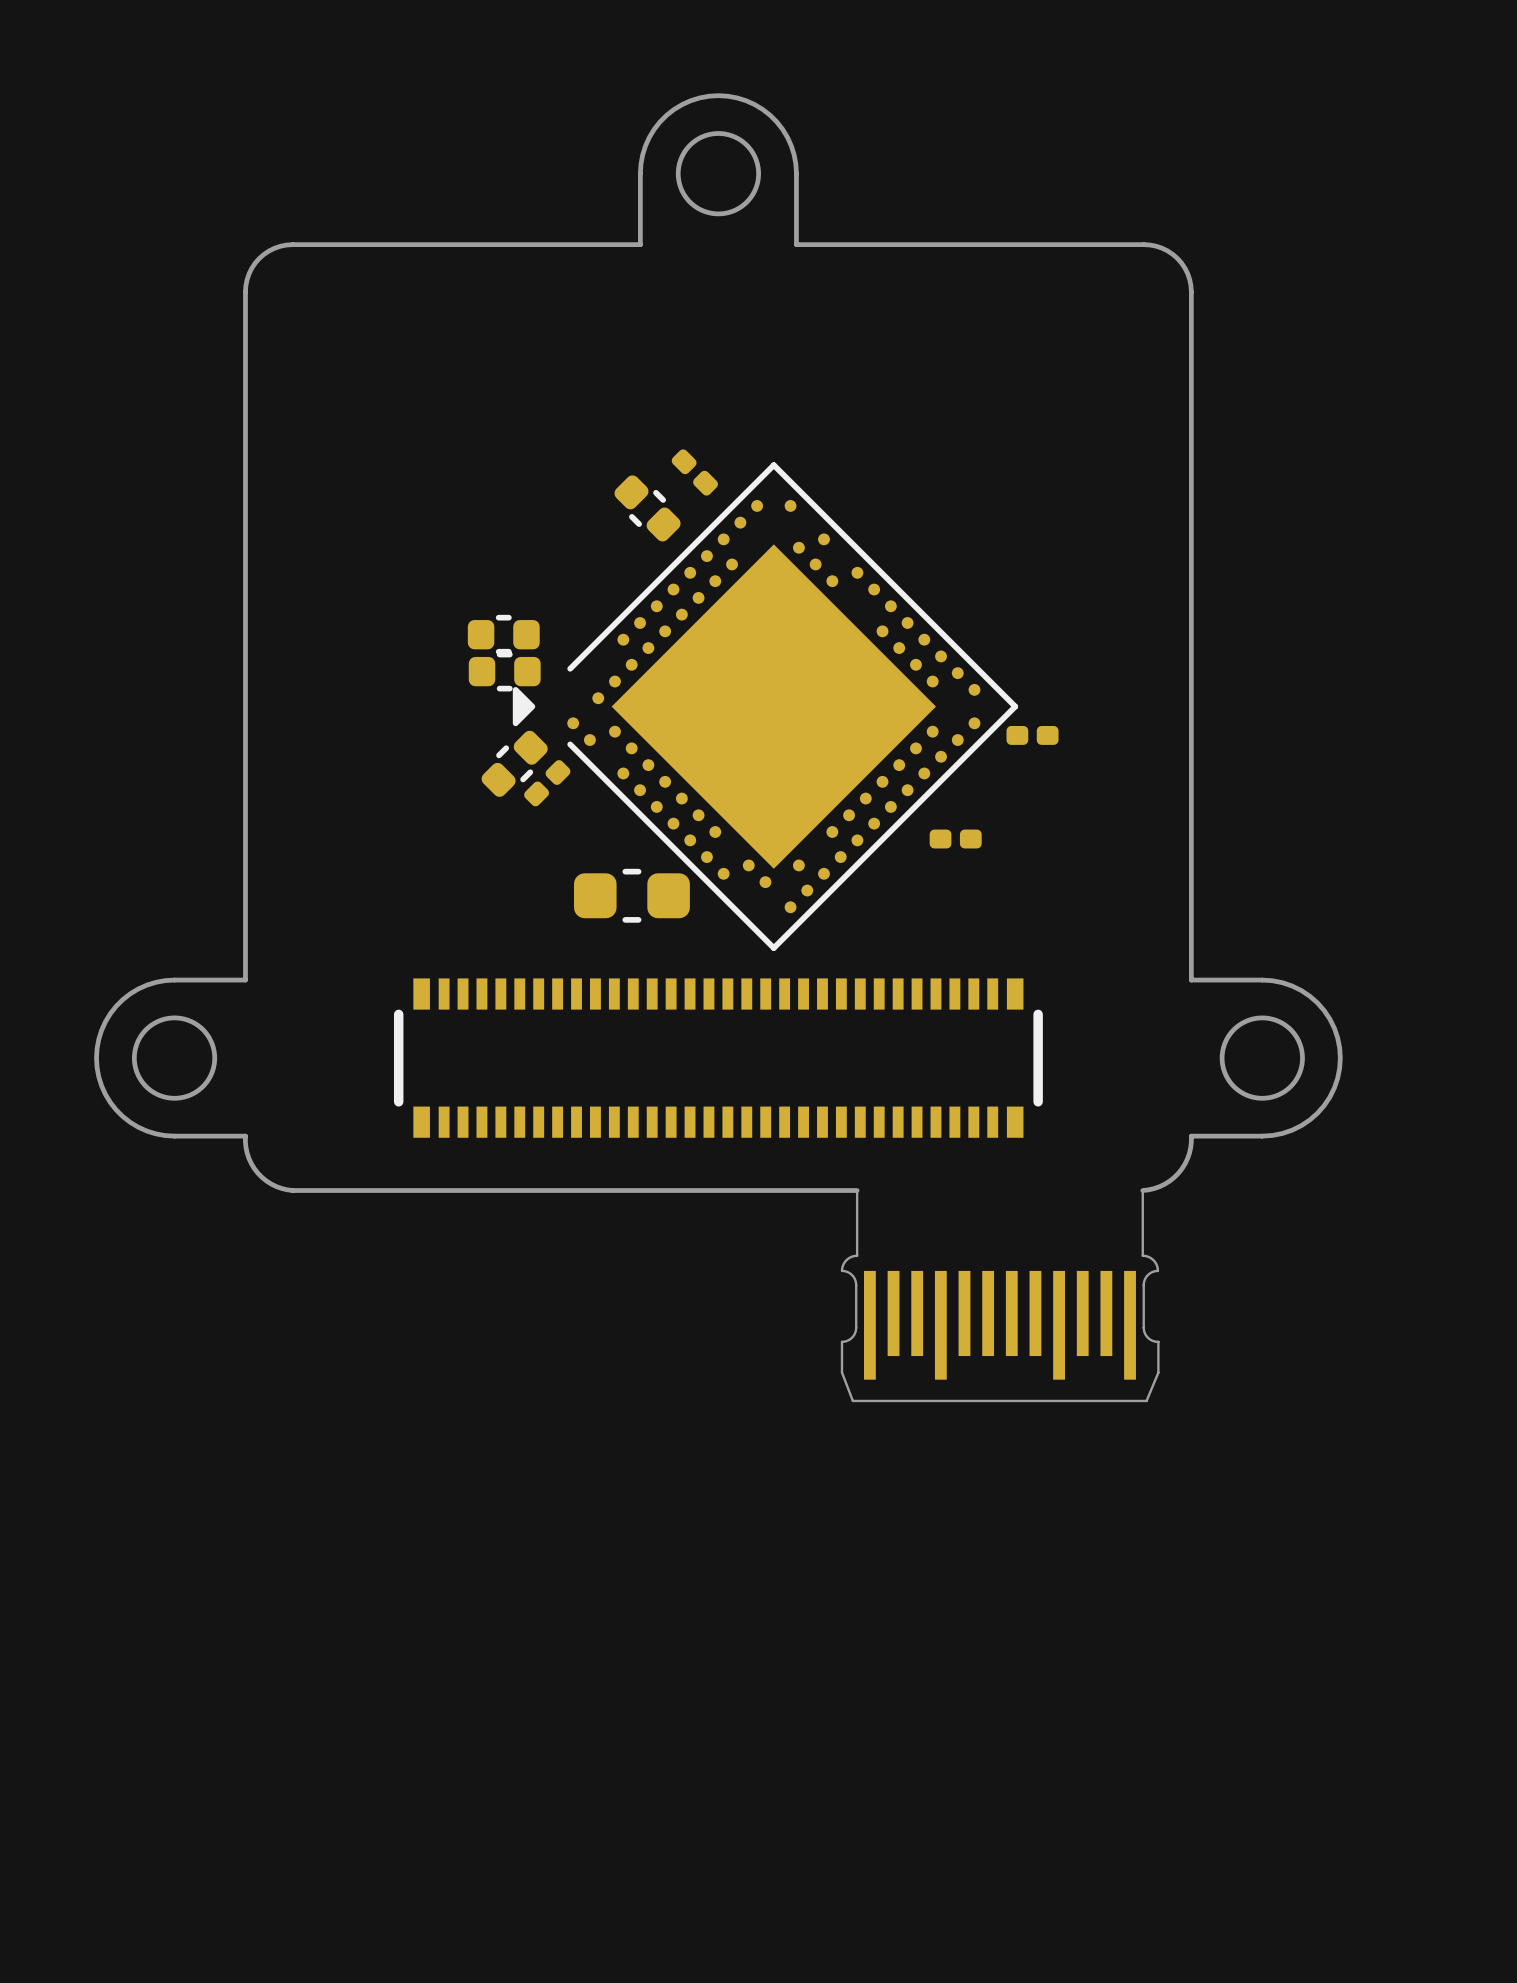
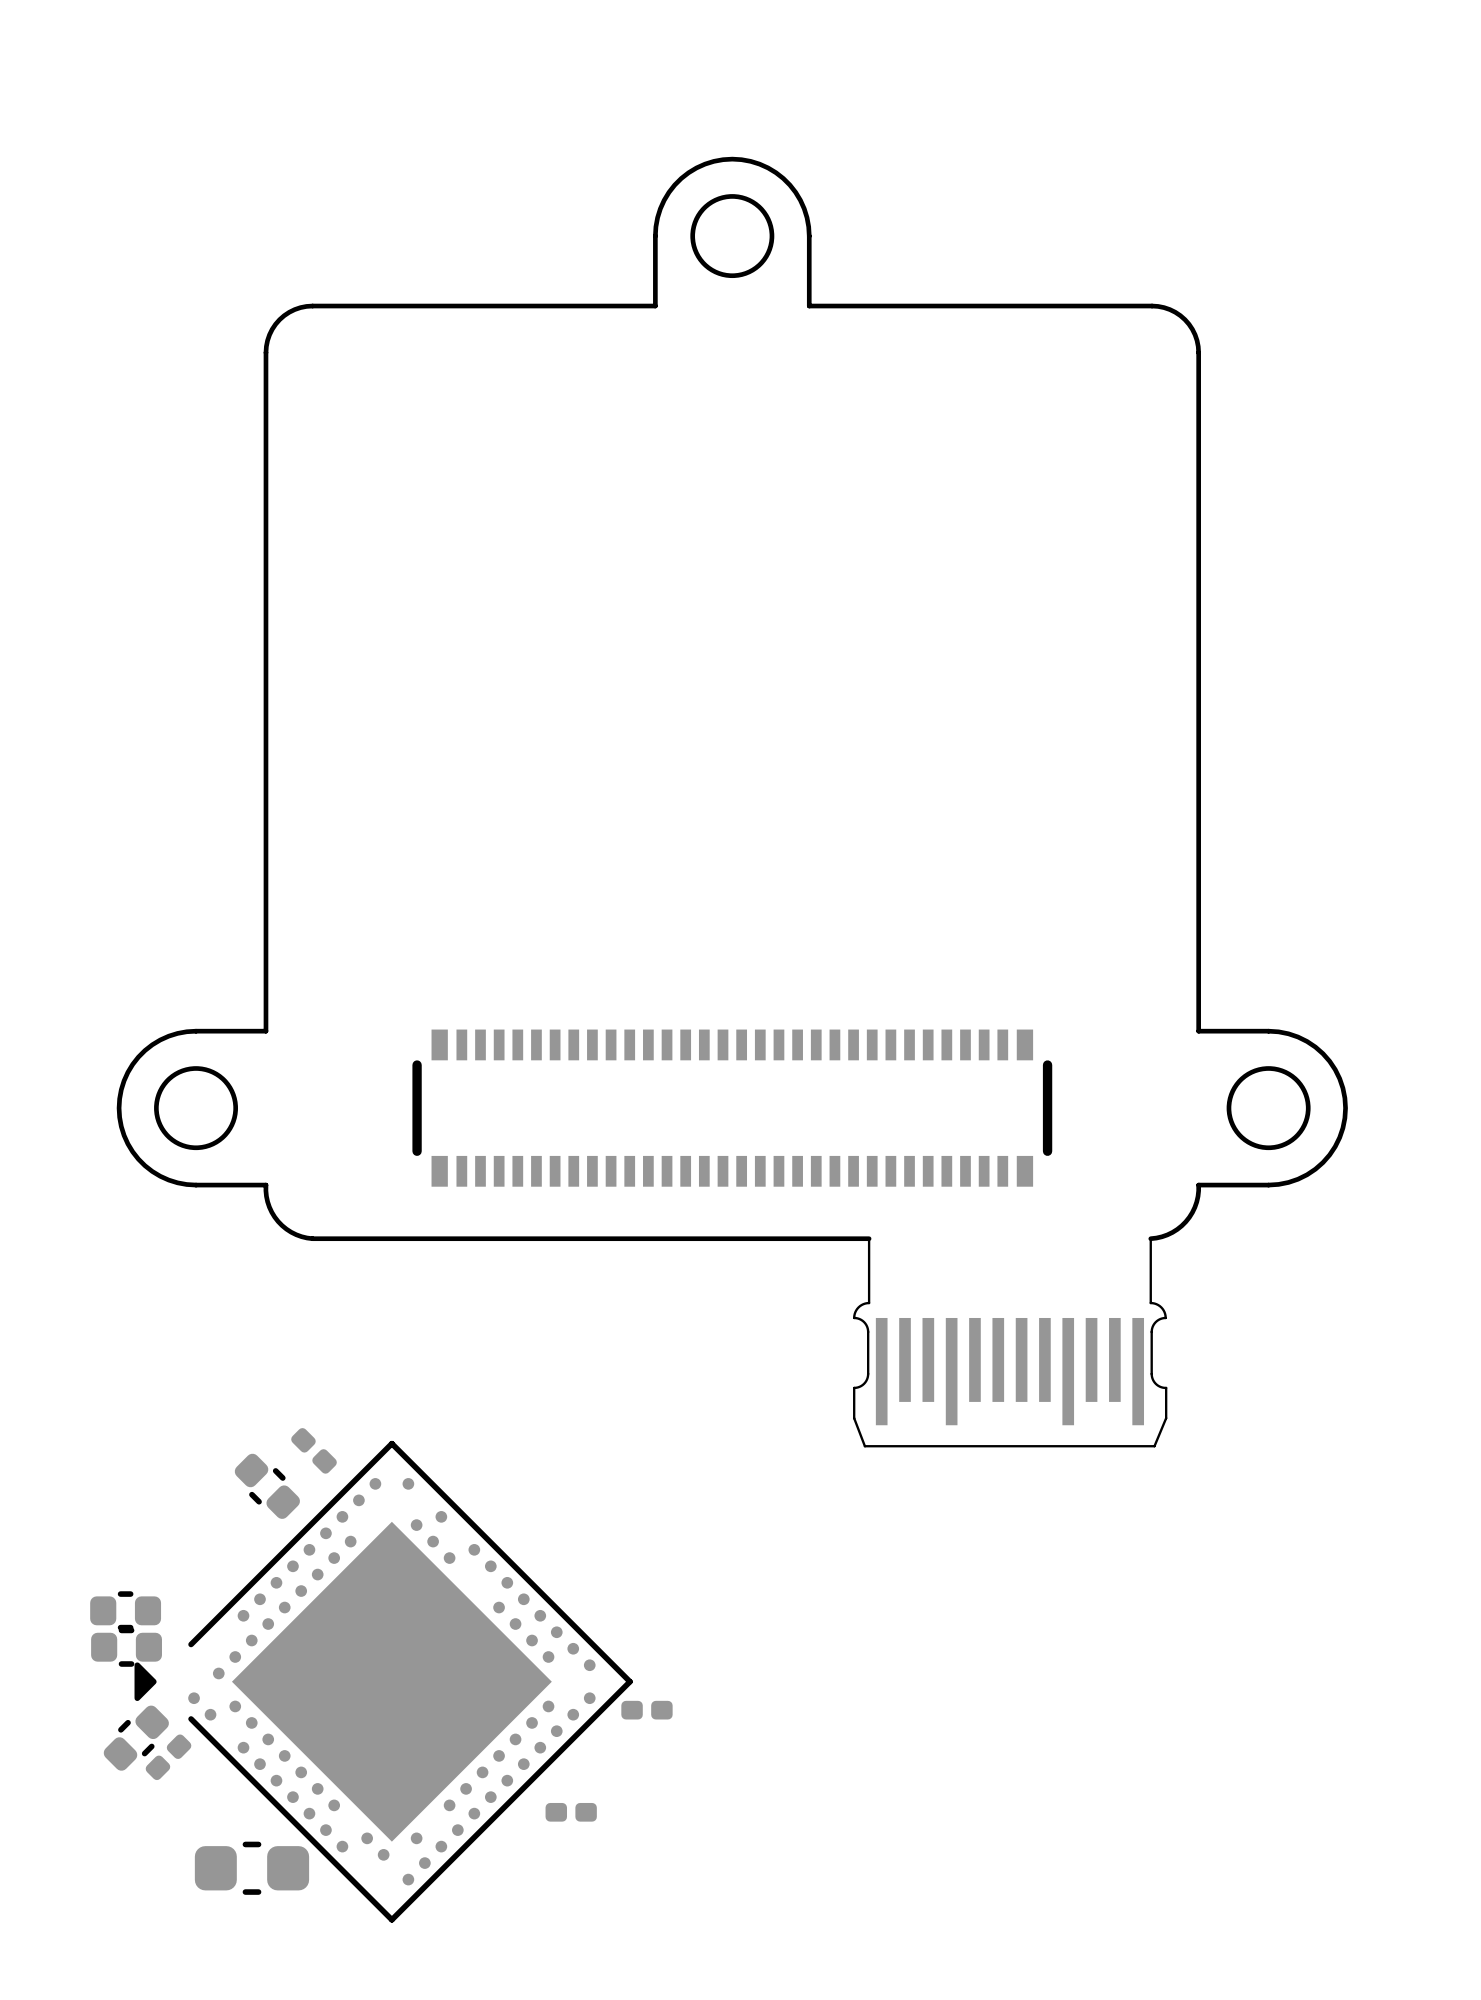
part: (694, 472) -> none
part: (647, 508) -> none
part: (503, 634) -> none
part: (504, 671) -> none
part position: (765, 706) -> (383, 1681)
part: (1032, 735) -> none
part: (514, 763) -> none
part: (547, 783) -> none
part: (955, 839) -> none
part position: (631, 895) -> (251, 1868)
part: none -> (314, 1450)
part: none -> (267, 1486)
part: none -> (125, 1610)
part: none -> (126, 1647)
part: none -> (646, 1710)
part: none -> (136, 1738)
part: none -> (168, 1757)
part: none -> (571, 1812)

